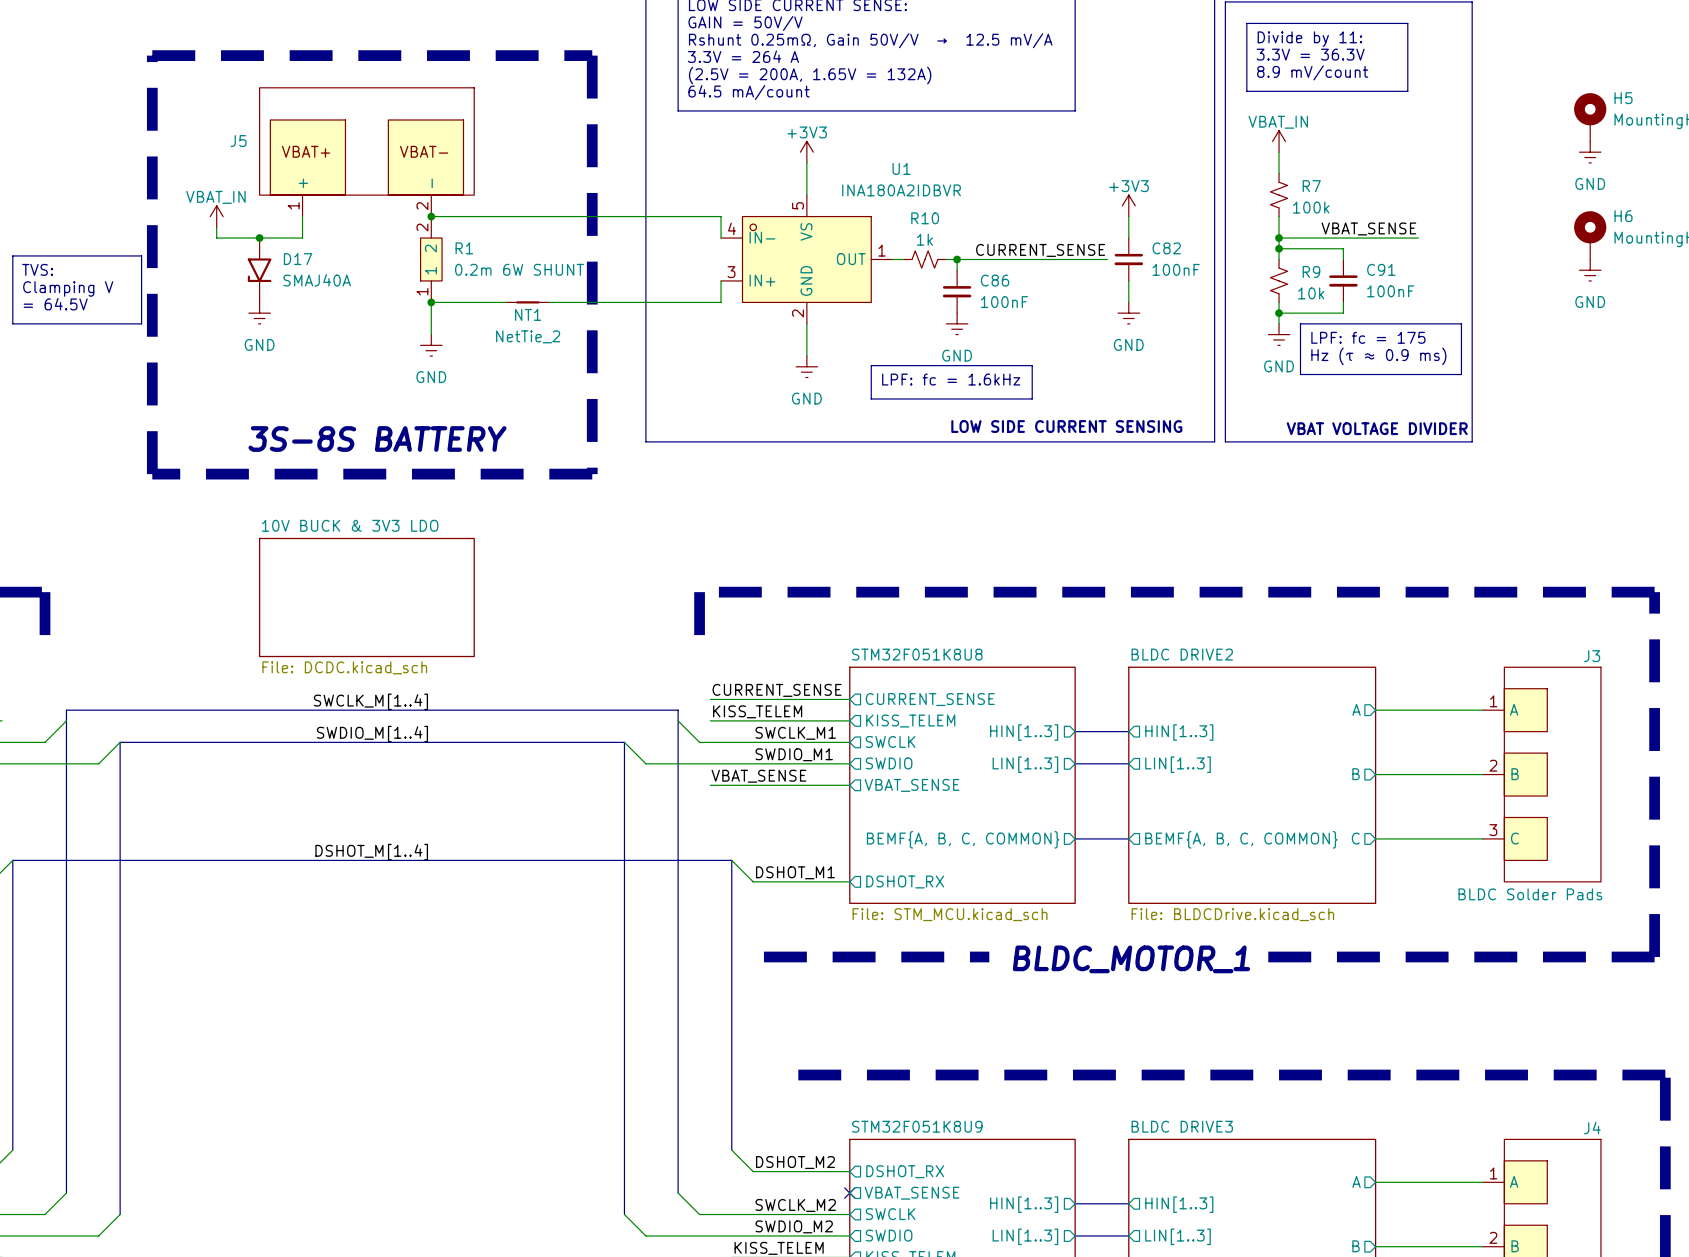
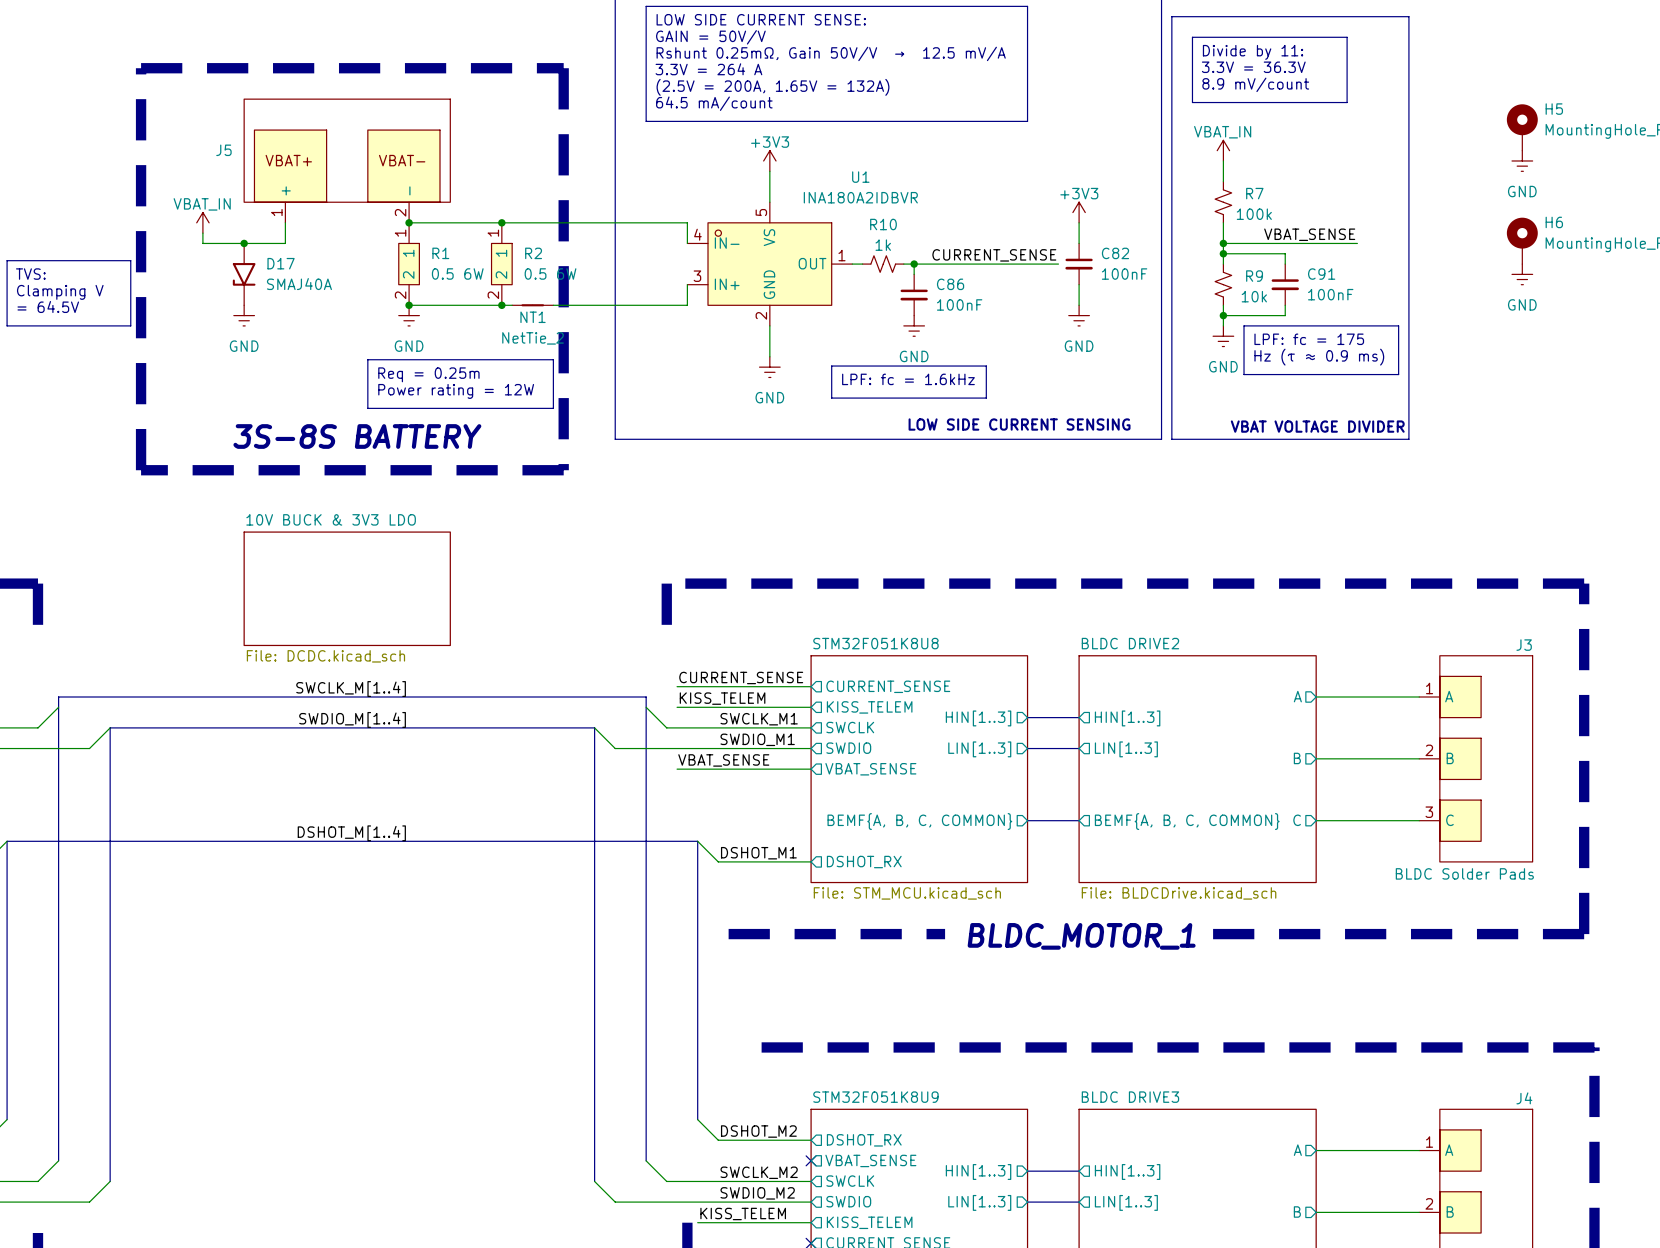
junction: none -> (501, 222)
R1 rotation: 0° (431, 259) -> 180° (409, 264)
R2: none -> 0.5 6W (501, 264)
R1 value: 0.2m 6W SHUNT (519, 269) -> 0.5 6W (457, 273)
wire: (431, 302) (431, 334) -> none
NT1 position: (527, 302) -> (532, 305)
junction: none -> (501, 305)
power symbol position: GND (431, 345) -> GND (409, 315)
line: none -> (367, 359) (553, 359) (553, 408) (367, 408) (367, 359)
text: none -> Req = 0.25m (428, 374)
text: none -> Power rating = 12W (456, 391)

